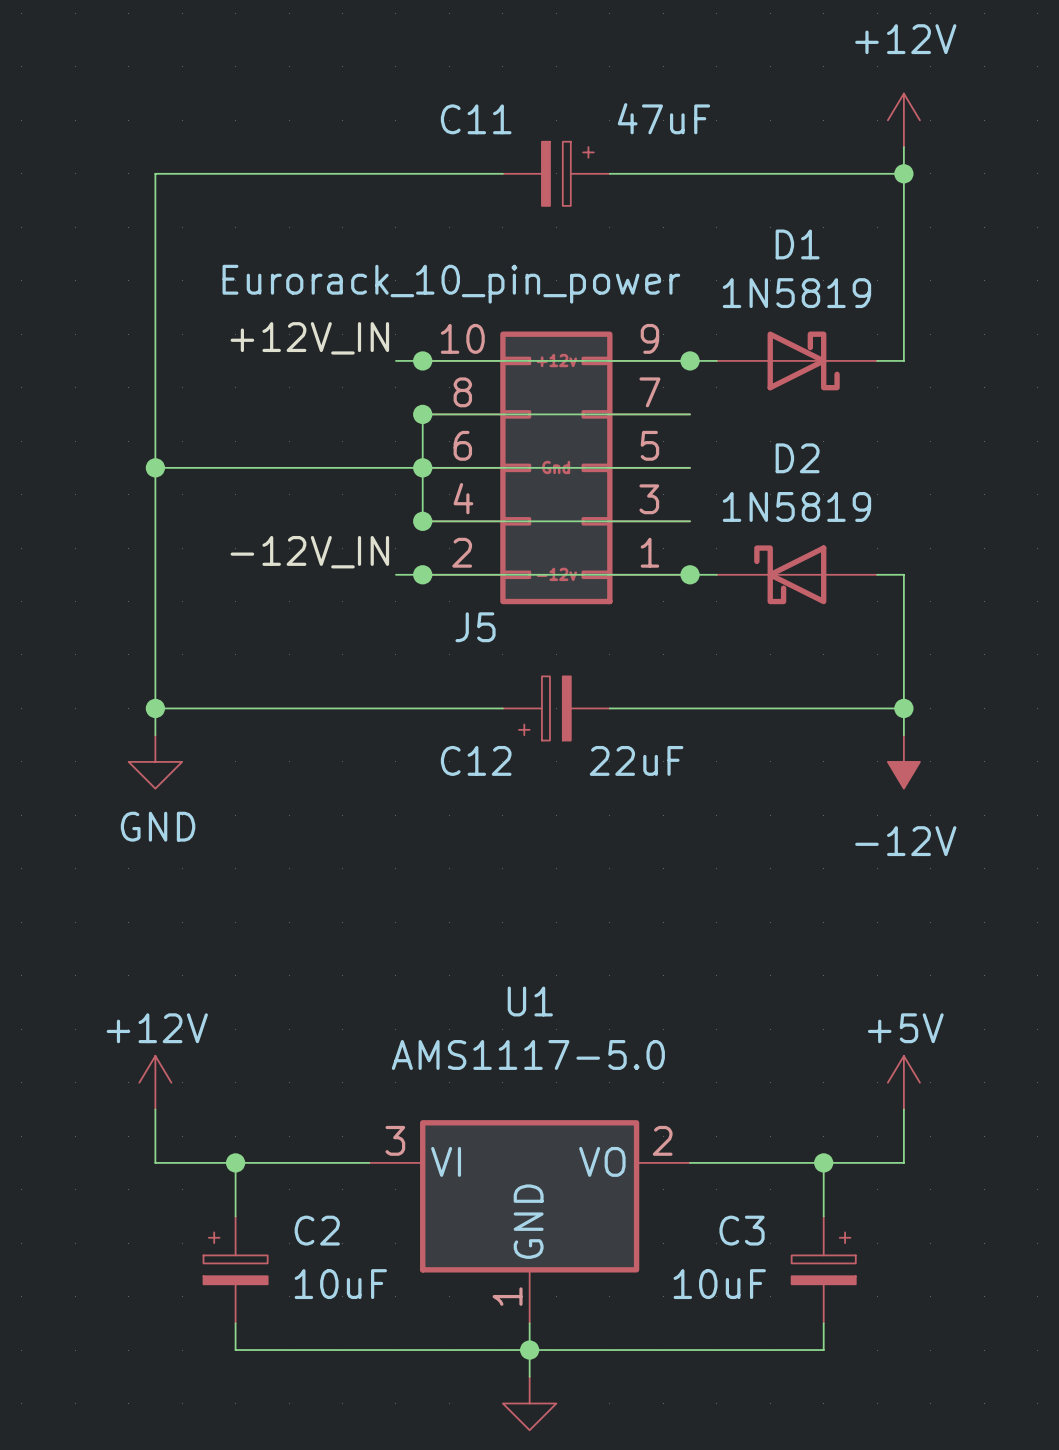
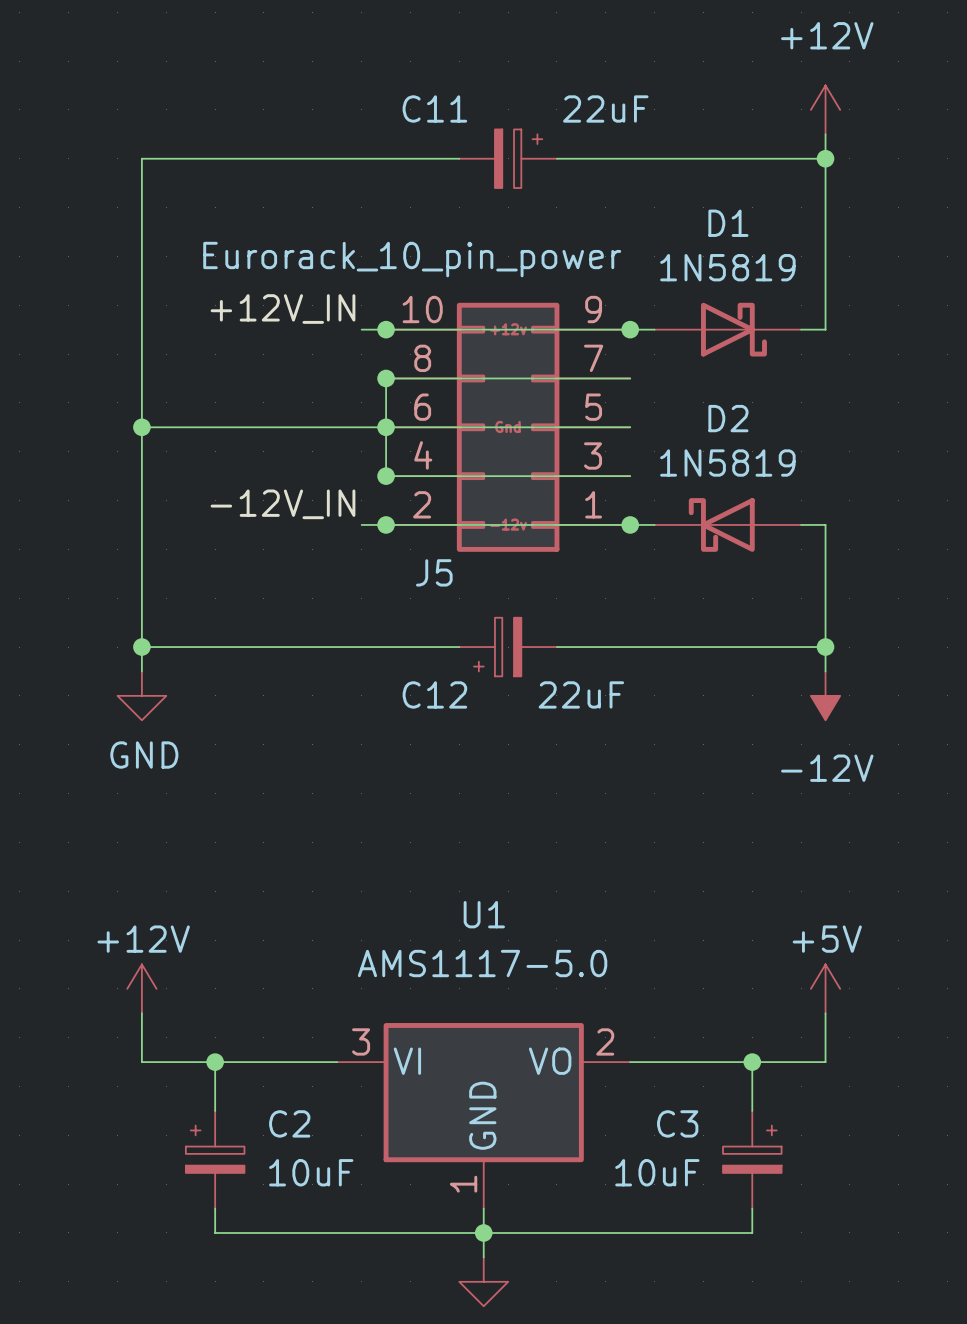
C11 value: 47uF (663, 118) -> 22uF (605, 108)

